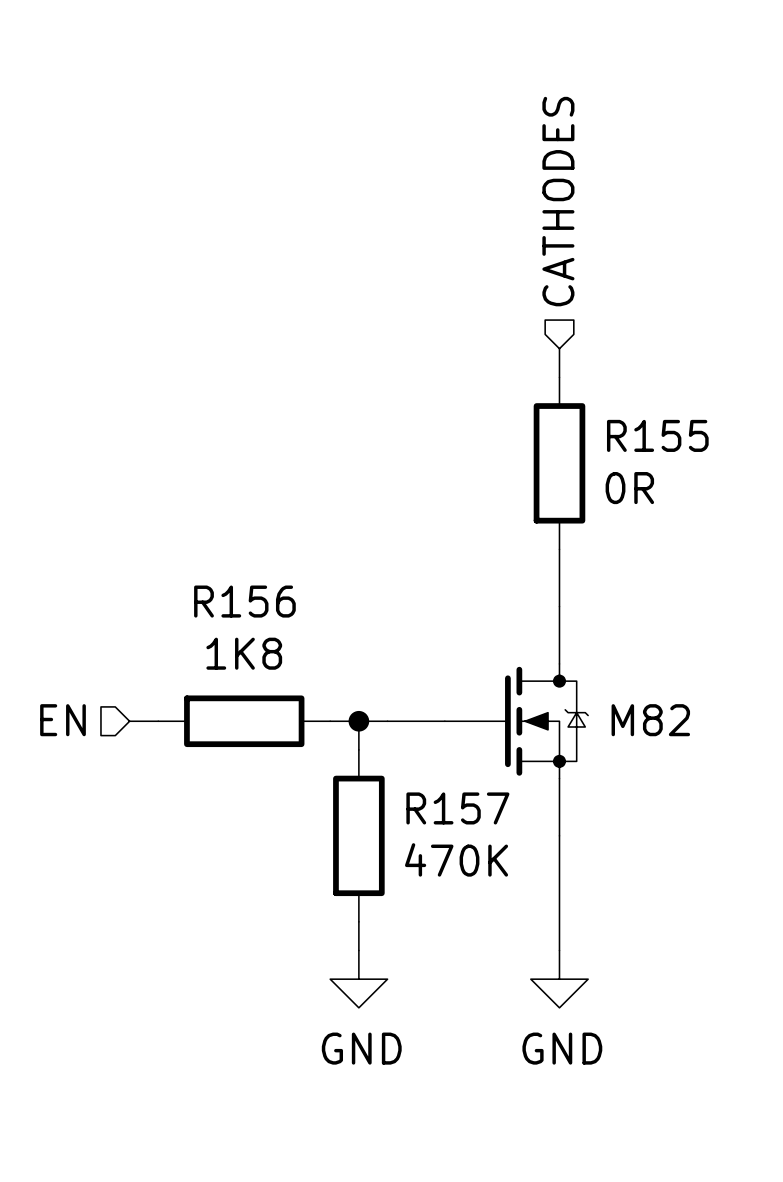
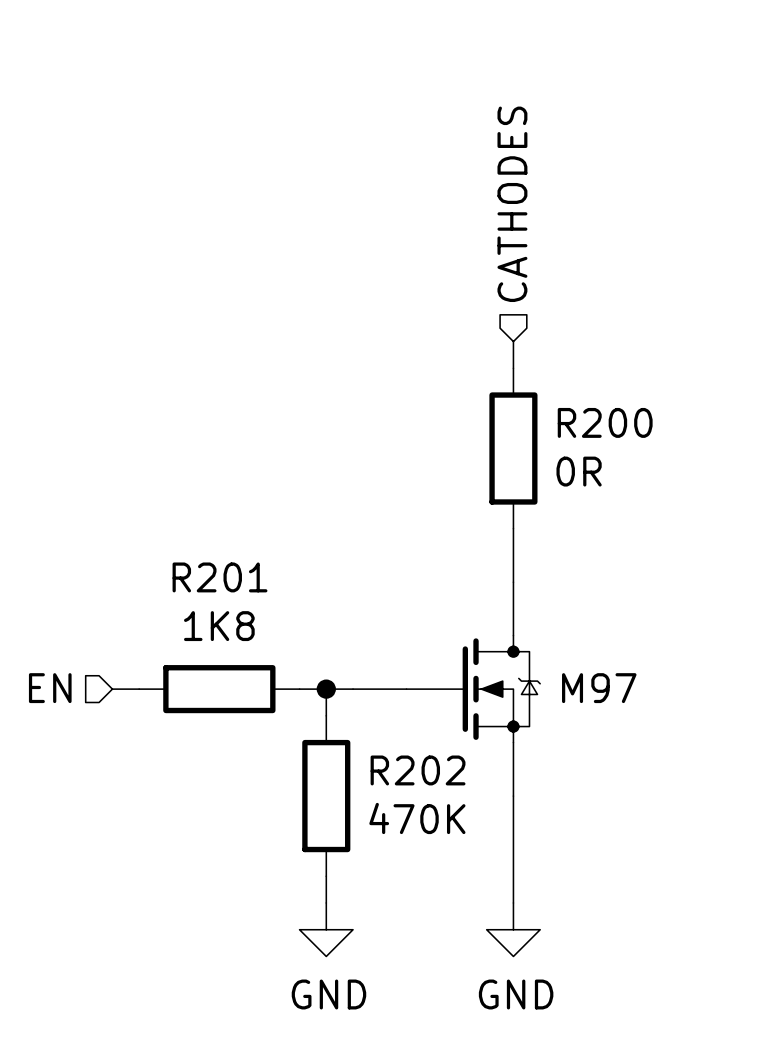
R155 name: R155 (657, 435) -> R200 (605, 422)
R156 name: R156 (244, 601) -> R201 (220, 577)
M82 name: M82 (650, 720) -> M97 (599, 688)
R157 name: R157 (457, 808) -> R202 (418, 770)

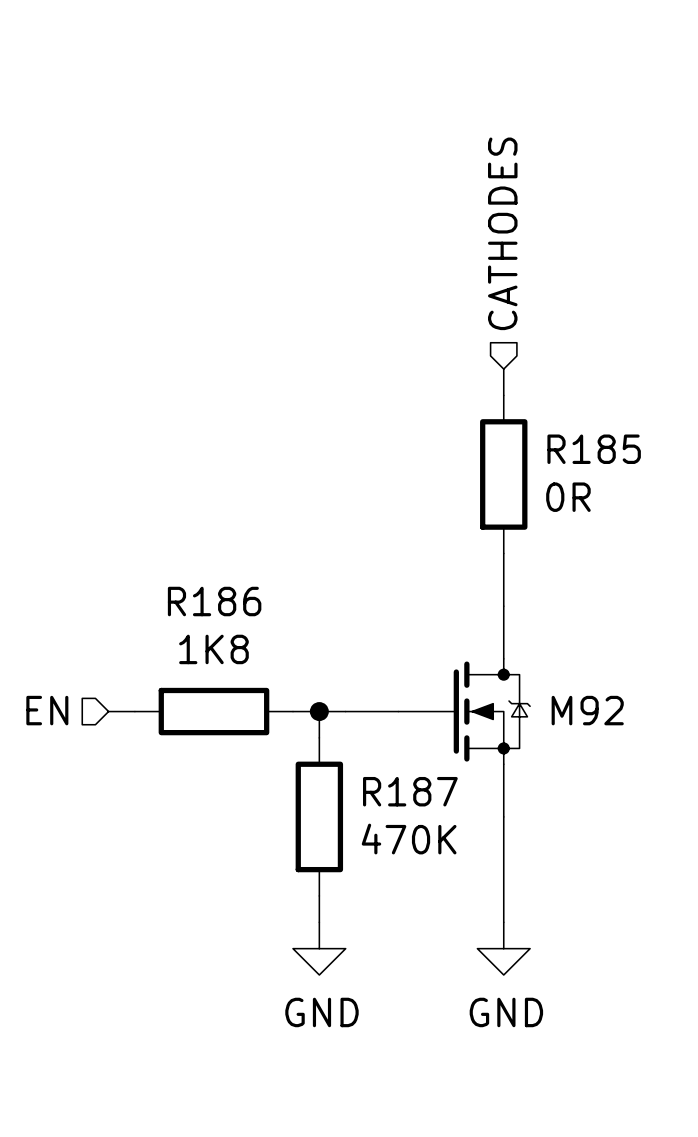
R200 name: R200 (605, 422) -> R185 (594, 449)
R201 name: R201 (220, 577) -> R186 (214, 601)
M97 name: M97 (599, 688) -> M92 (587, 710)
R202 name: R202 (418, 770) -> R187 (410, 791)

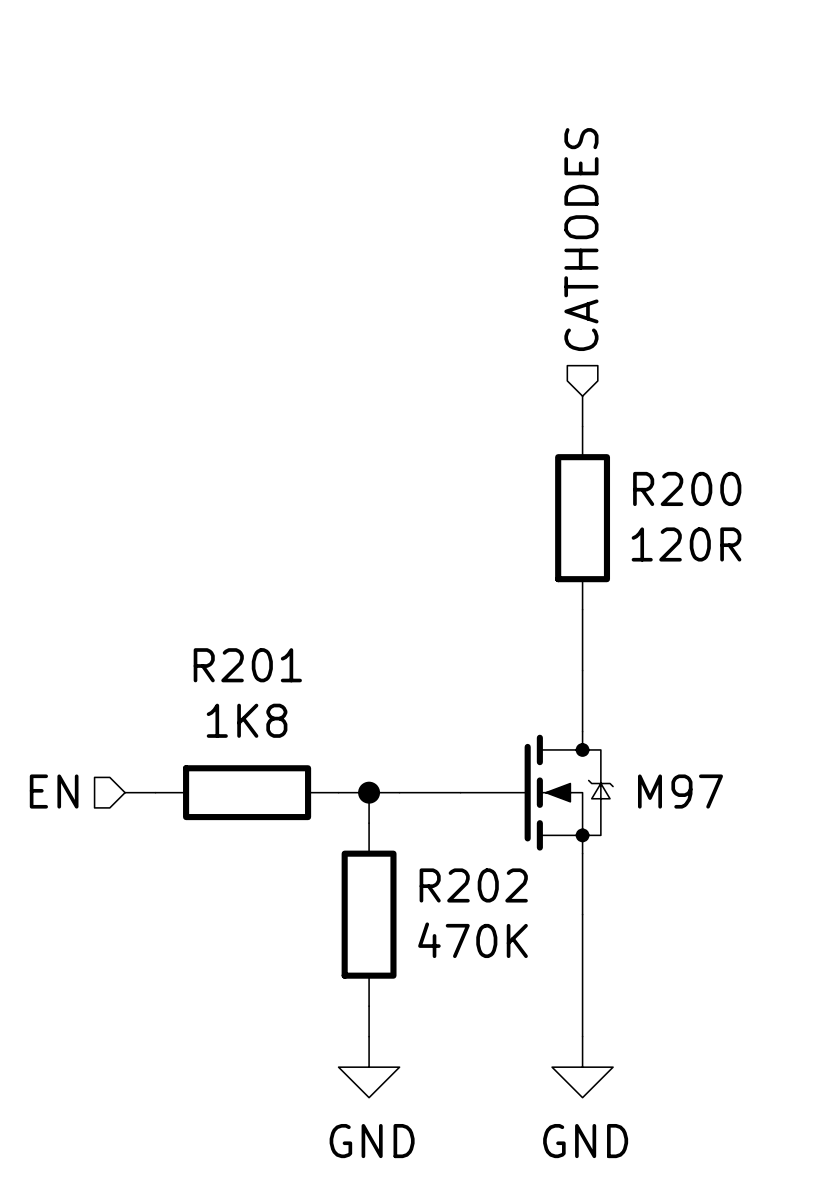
R185 name: R185 (594, 449) -> R200 (687, 488)
R185 value: 0R (568, 497) -> 120R (686, 544)
R186 name: R186 (214, 601) -> R201 (247, 665)
M92 name: M92 (587, 710) -> M97 (680, 791)
R187 name: R187 (410, 791) -> R202 (473, 885)

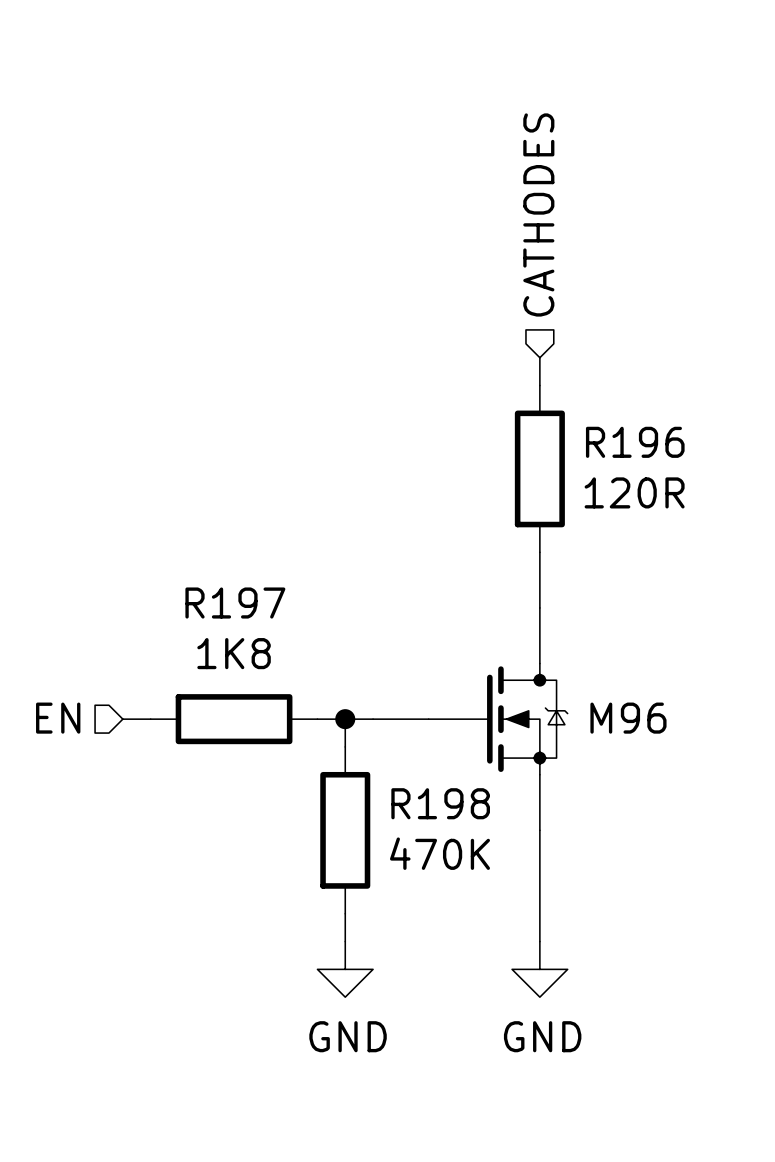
R200 name: R200 (687, 488) -> R196 (635, 442)
R201 name: R201 (247, 665) -> R197 (235, 603)
M97 name: M97 (680, 791) -> M96 (628, 718)
R202 name: R202 (473, 885) -> R198 (440, 803)

